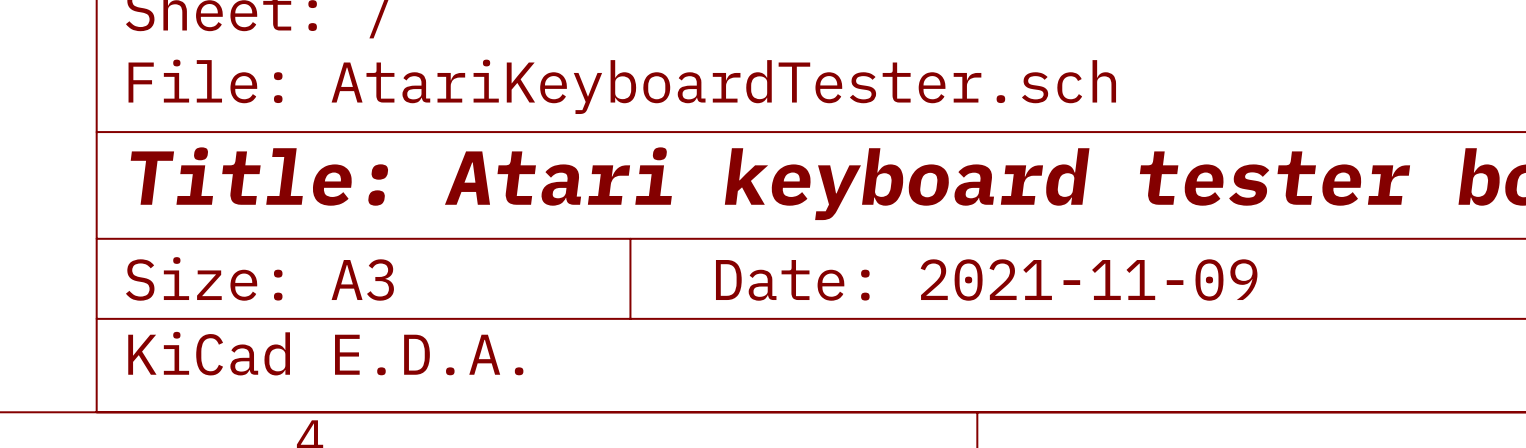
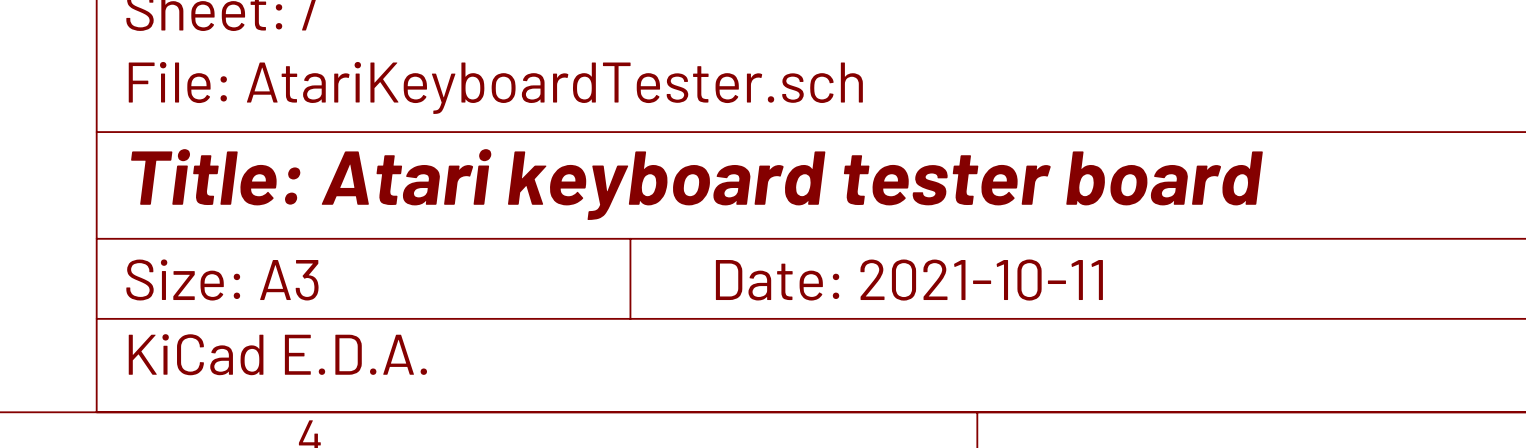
title block: Date: 2021-11-09 (986, 280) -> Date: 2021-10-11 (909, 280)

